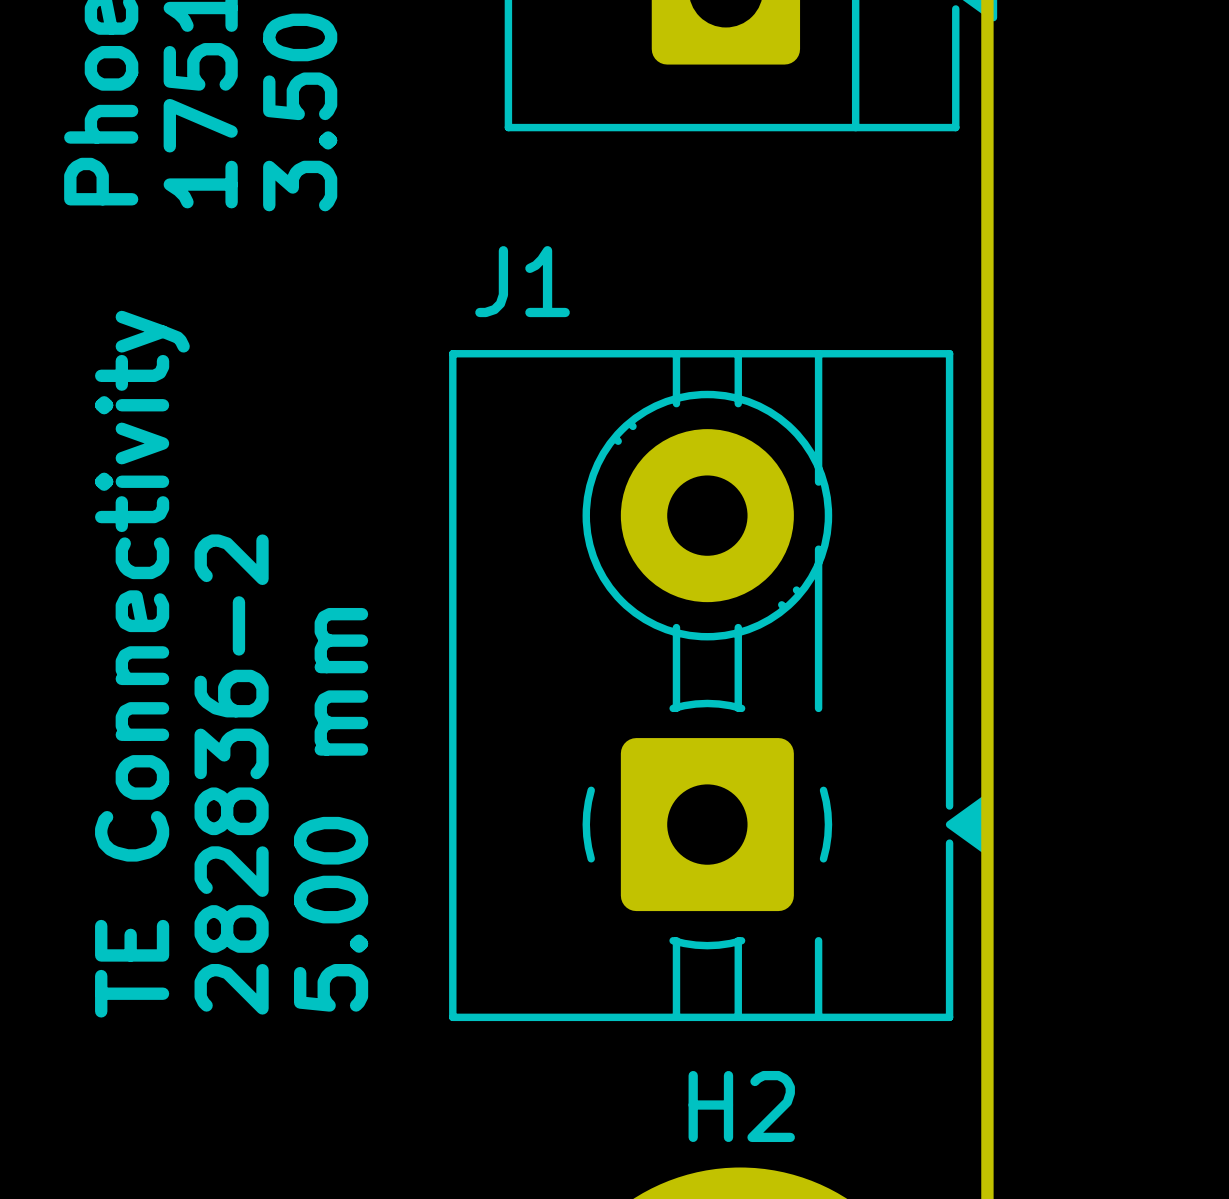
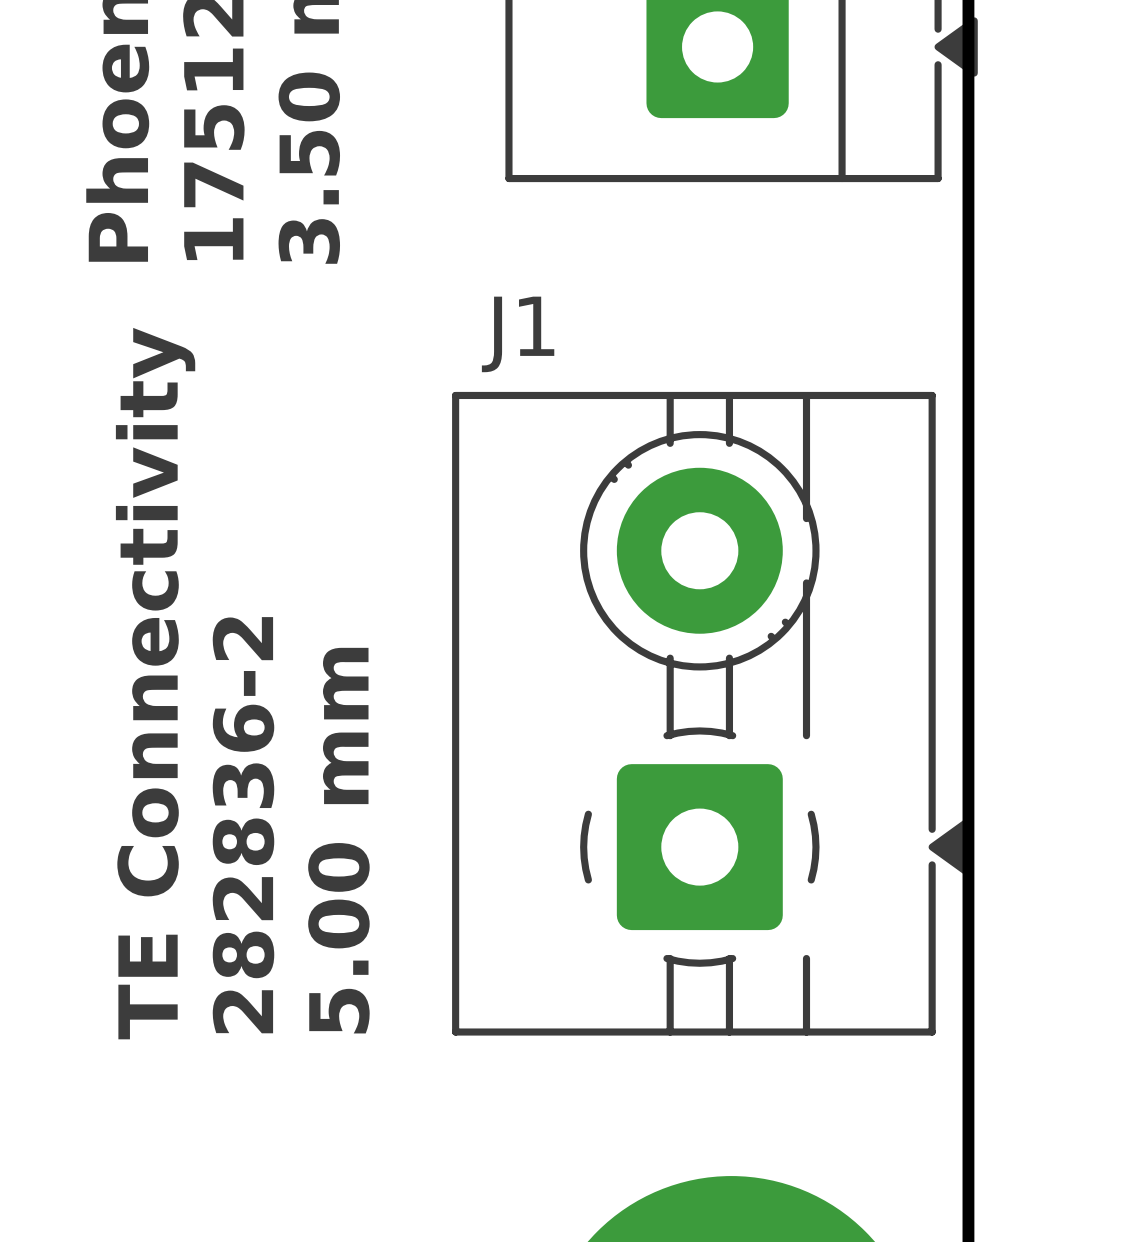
H2 name: H2 (741, 1106) -> none

